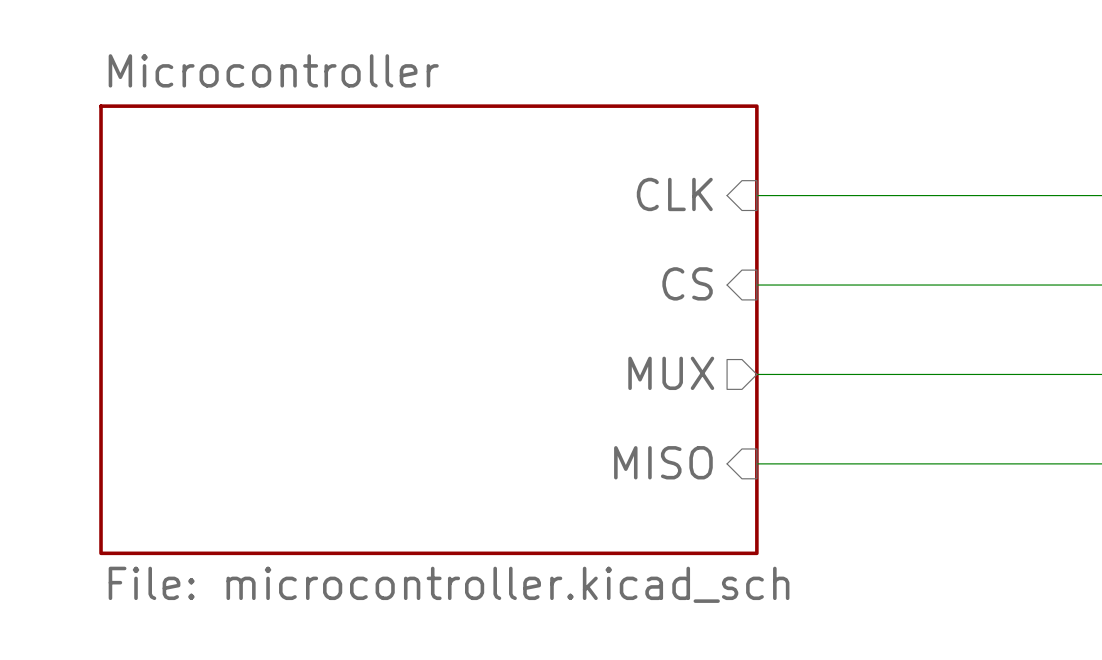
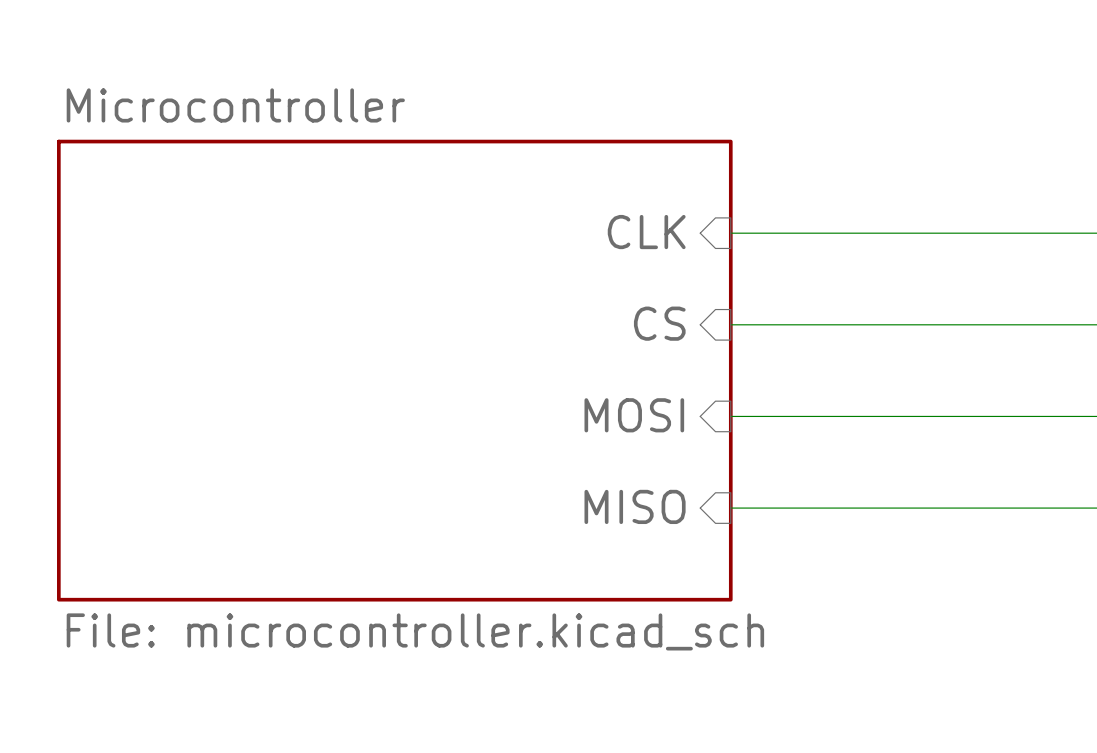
sheet pin shape: output (671, 373) -> input (634, 415)
sheet pin: MUX (671, 373) -> MOSI (634, 415)

